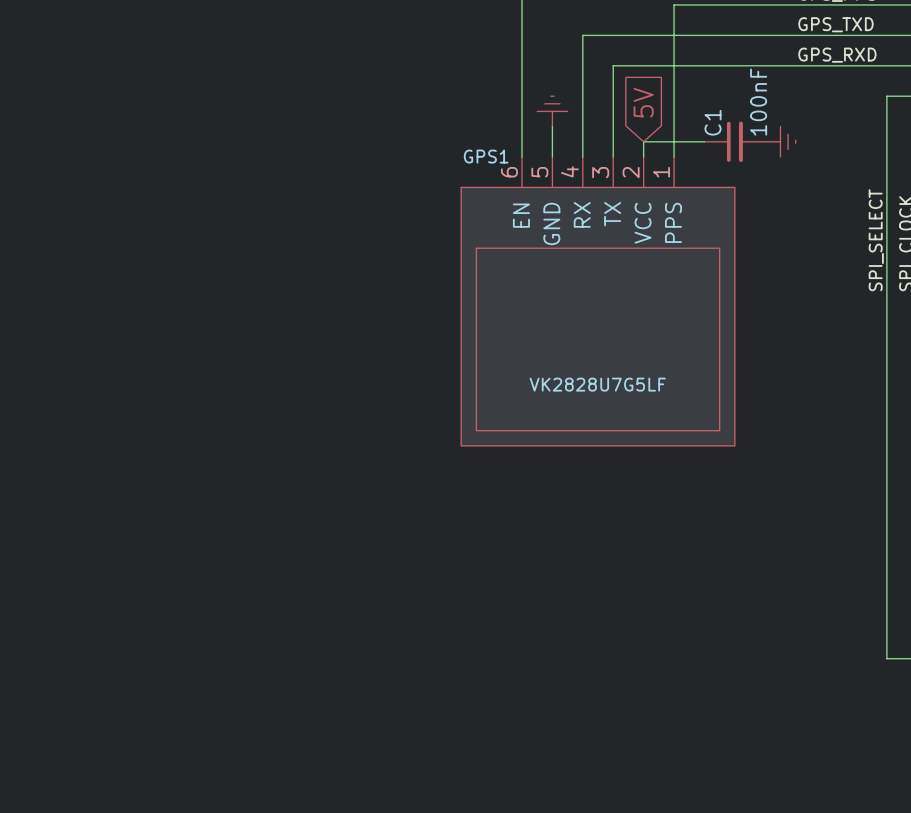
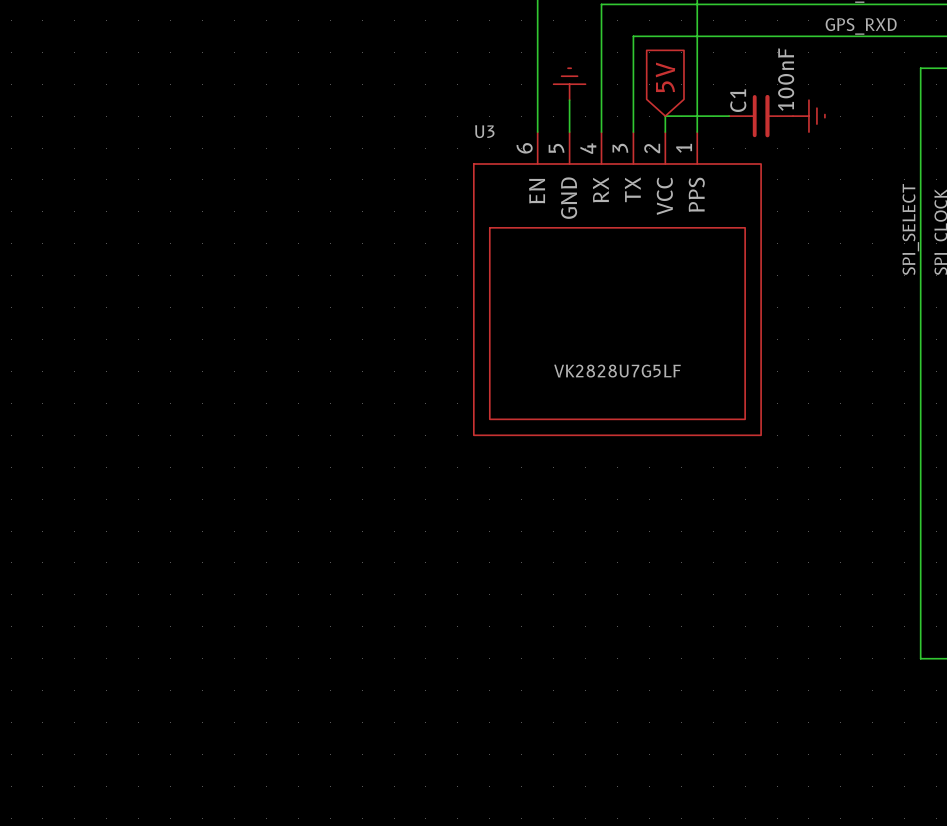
GPS1 name: GPS1 (486, 156) -> U3 (484, 131)

